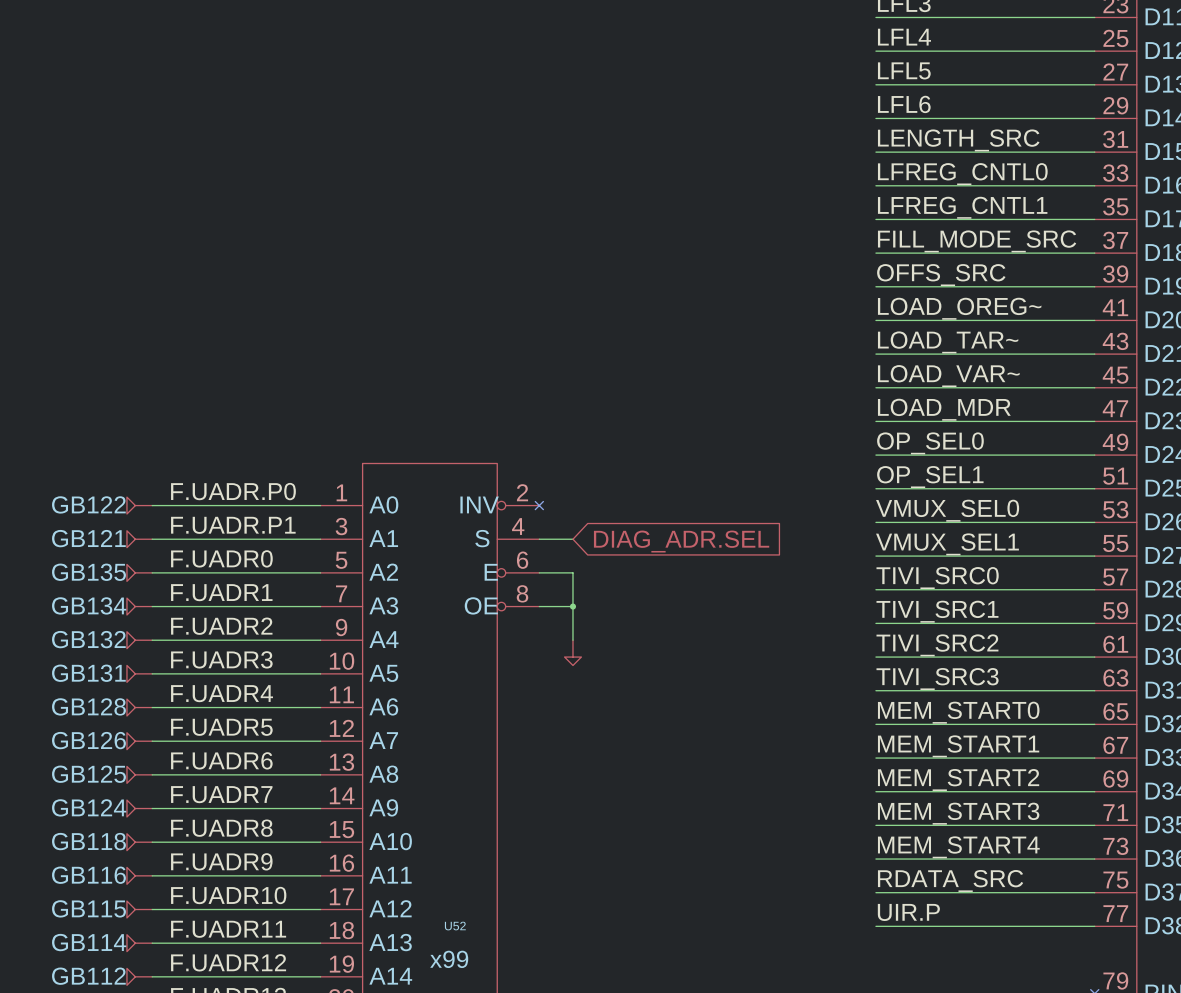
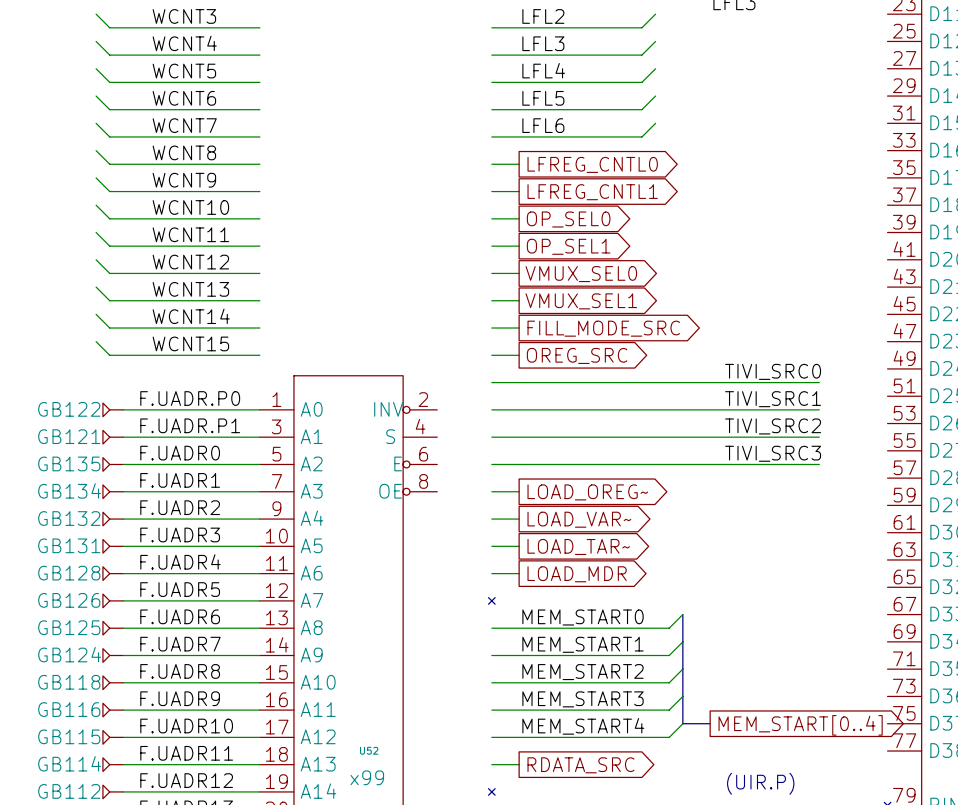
wire: none -> (96, 14) (109, 27) (259, 27)
wire: none -> (655, 14) (641, 27) (491, 27)
wire: (875, 17) (1094, 17) -> none
label: none -> WCNT3 (184, 16)
label: none -> LFL2 (543, 16)
label: LFL4 (904, 37) -> none
wire: none -> (96, 41) (109, 55) (259, 55)
wire: none -> (655, 41) (641, 55) (491, 55)
wire: (875, 51) (1094, 51) -> none
label: none -> WCNT4 (184, 43)
label: none -> LFL3 (543, 43)
label: LFL5 (904, 70) -> none
wire: none -> (96, 68) (109, 82) (259, 82)
wire: none -> (655, 68) (641, 82) (491, 82)
wire: (875, 84) (1094, 84) -> none
label: none -> WCNT5 (184, 71)
label: none -> LFL4 (543, 70)
label: LFL6 (904, 104) -> none
wire: none -> (96, 96) (109, 109) (259, 109)
wire: none -> (655, 96) (641, 109) (491, 109)
wire: (875, 118) (1094, 118) -> none
label: none -> WCNT6 (184, 98)
label: none -> LFL5 (543, 98)
label: LENGTH_SRC (958, 140) -> none
wire: none -> (96, 123) (109, 136) (259, 136)
wire: none -> (655, 123) (641, 136) (491, 136)
wire: (875, 152) (1094, 152) -> none
label: none -> WCNT7 (184, 125)
label: none -> LFL6 (543, 125)
label: LFREG_CNTL0 (962, 174) -> none
wire: none -> (96, 150) (109, 164) (259, 164)
wire: (875, 185) (1094, 185) -> none
label: none -> WCNT8 (184, 152)
wire: none -> (491, 164) (519, 164)
global label: none -> LFREG_CNTL0 (592, 164)
label: LFREG_CNTL1 (962, 207) -> none
wire: none -> (96, 177) (109, 191) (259, 191)
wire: (875, 219) (1094, 219) -> none
label: none -> WCNT9 (184, 180)
wire: none -> (491, 191) (519, 191)
global label: none -> LFREG_CNTL1 (592, 192)
label: FILL_MODE_SRC (977, 241) -> none
wire: none -> (96, 205) (109, 218) (259, 218)
wire: (875, 253) (1094, 253) -> none
label: none -> WCNT10 (190, 207)
wire: none -> (491, 218) (519, 218)
global label: none -> OP_SEL0 (568, 219)
label: OFFS_SRC (941, 275) -> none
wire: none -> (96, 232) (109, 246) (259, 246)
wire: (875, 286) (1094, 286) -> none
label: none -> WCNT11 (190, 234)
wire: none -> (491, 246) (519, 246)
global label: none -> OP_SEL1 (568, 246)
label: LOAD_OREG~ (959, 308) -> none
wire: none -> (96, 259) (109, 273) (259, 273)
wire: (875, 320) (1094, 320) -> none
label: none -> WCNT12 (190, 262)
wire: none -> (491, 273) (519, 273)
global label: none -> VMUX_SEL0 (581, 274)
label: LOAD_TAR~ (948, 342) -> none
wire: none -> (96, 287) (109, 300) (259, 300)
wire: (875, 354) (1094, 354) -> none
label: none -> WCNT13 (190, 289)
wire: none -> (491, 300) (519, 300)
global label: none -> VMUX_SEL1 (581, 301)
label: LOAD_VAR~ (948, 376) -> none
wire: none -> (96, 314) (109, 328) (259, 328)
wire: (875, 387) (1094, 387) -> none
label: none -> WCNT14 (191, 316)
wire: none -> (491, 328) (519, 328)
global label: none -> FILL_MODE_SRC (603, 328)
label: LOAD_MDR (944, 409) -> none
wire: none -> (96, 341) (109, 355) (259, 355)
wire: (875, 421) (1094, 421) -> none
label: none -> WCNT15 (190, 343)
wire: none -> (491, 355) (519, 355)
global label: none -> OREG_SRC (577, 355)
label: OP_SEL0 (930, 443) -> none
wire: (875, 455) (1094, 455) -> none
wire: none -> (491, 382) (819, 382)
label: OP_SEL1 (930, 477) -> none
wire: (875, 488) (1094, 488) -> none
no-connect mark: (539, 505) -> none
wire: none -> (491, 409) (819, 409)
label: VMUX_SEL0 (947, 510) -> none
wire: (875, 522) (1094, 522) -> none
wire: (539, 539) (572, 539) -> (491, 491) (519, 491)
wire: none -> (491, 437) (819, 437)
global label: DIAG_ADR.SEL (681, 541) -> none
label: VMUX_SEL1 (947, 544) -> none
wire: (875, 556) (1094, 556) -> none
wire: (539, 572) (572, 572) (572, 640) -> none
wire: none -> (491, 464) (819, 464)
label position: TIVI_SRC0 (937, 578) -> TIVI_SRC0 (773, 371)
wire: (875, 589) (1094, 589) -> none
wire: (539, 606) (572, 606) -> (491, 546) (519, 546)
junction: (572, 606) -> none
global label: none -> LOAD_OREG~ (587, 492)
label position: TIVI_SRC1 (937, 611) -> TIVI_SRC1 (773, 399)
wire: (875, 623) (1094, 623) -> none
wire: none -> (491, 519) (519, 519)
global label: none -> LOAD_VAR~ (579, 519)
label position: TIVI_SRC2 (937, 645) -> TIVI_SRC2 (773, 426)
power symbol: (572, 653) -> none
wire: (875, 657) (1094, 657) -> none
global label: none -> LOAD_TAR~ (578, 546)
label position: TIVI_SRC3 (937, 679) -> TIVI_SRC3 (773, 453)
wire: (875, 690) (1094, 690) -> none
wire: none -> (491, 573) (519, 573)
global label: none -> LOAD_MDR (577, 574)
label: MEM_START0 (958, 712) -> none
wire: (875, 724) (1094, 724) -> none
no-connect mark: none -> (491, 600)
label: MEM_START1 (958, 746) -> none
wire: none -> (682, 614) (669, 628) (491, 628)
bus: none -> (682, 614) (682, 723) (710, 723)
wire: (875, 758) (1094, 758) -> none
label: none -> MEM_START0 (583, 617)
label: MEM_START2 (958, 779) -> none
wire: none -> (682, 641) (669, 655) (491, 655)
wire: (875, 791) (1094, 791) -> none
label: none -> MEM_START1 (583, 644)
label: MEM_START3 (958, 813) -> none
wire: none -> (682, 669) (669, 682) (491, 682)
wire: (875, 825) (1094, 825) -> none
label: none -> MEM_START2 (583, 672)
label: MEM_START4 (958, 847) -> none
wire: none -> (682, 696) (669, 710) (491, 710)
wire: (875, 859) (1094, 859) -> none
label: none -> MEM_START3 (583, 699)
label: RDATA_SRC (950, 880) -> none
wire: none -> (682, 723) (669, 737) (491, 737)
wire: (875, 892) (1094, 892) -> none
global label: none -> MEM_START[0..4] (800, 725)
label: none -> MEM_START4 (583, 726)
label: UIR.P (908, 912) -> none
wire: (875, 926) (1094, 926) -> none
wire: none -> (491, 764) (519, 764)
global label: none -> RDATA_SRC (580, 765)
text: none -> (UIR.P) (760, 783)
no-connect mark: none -> (491, 791)

